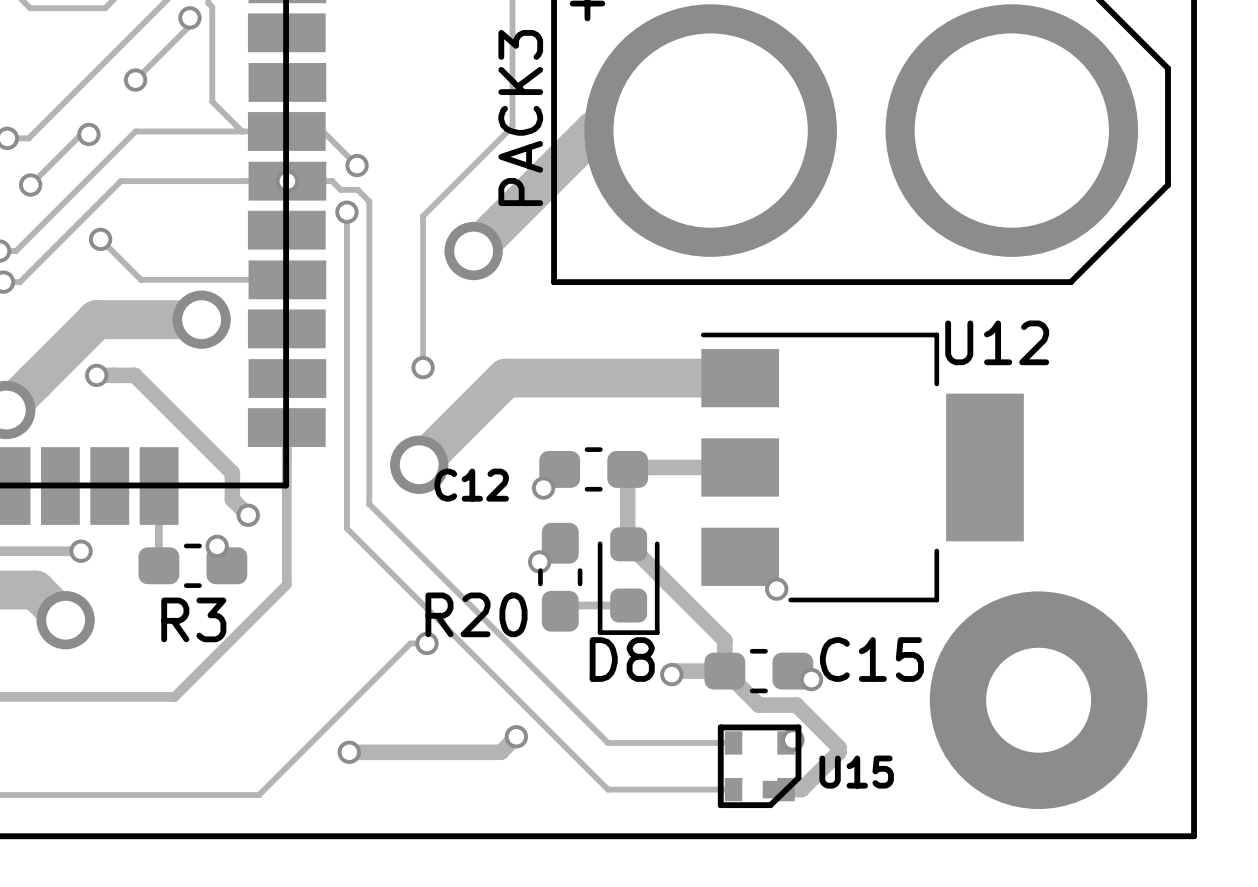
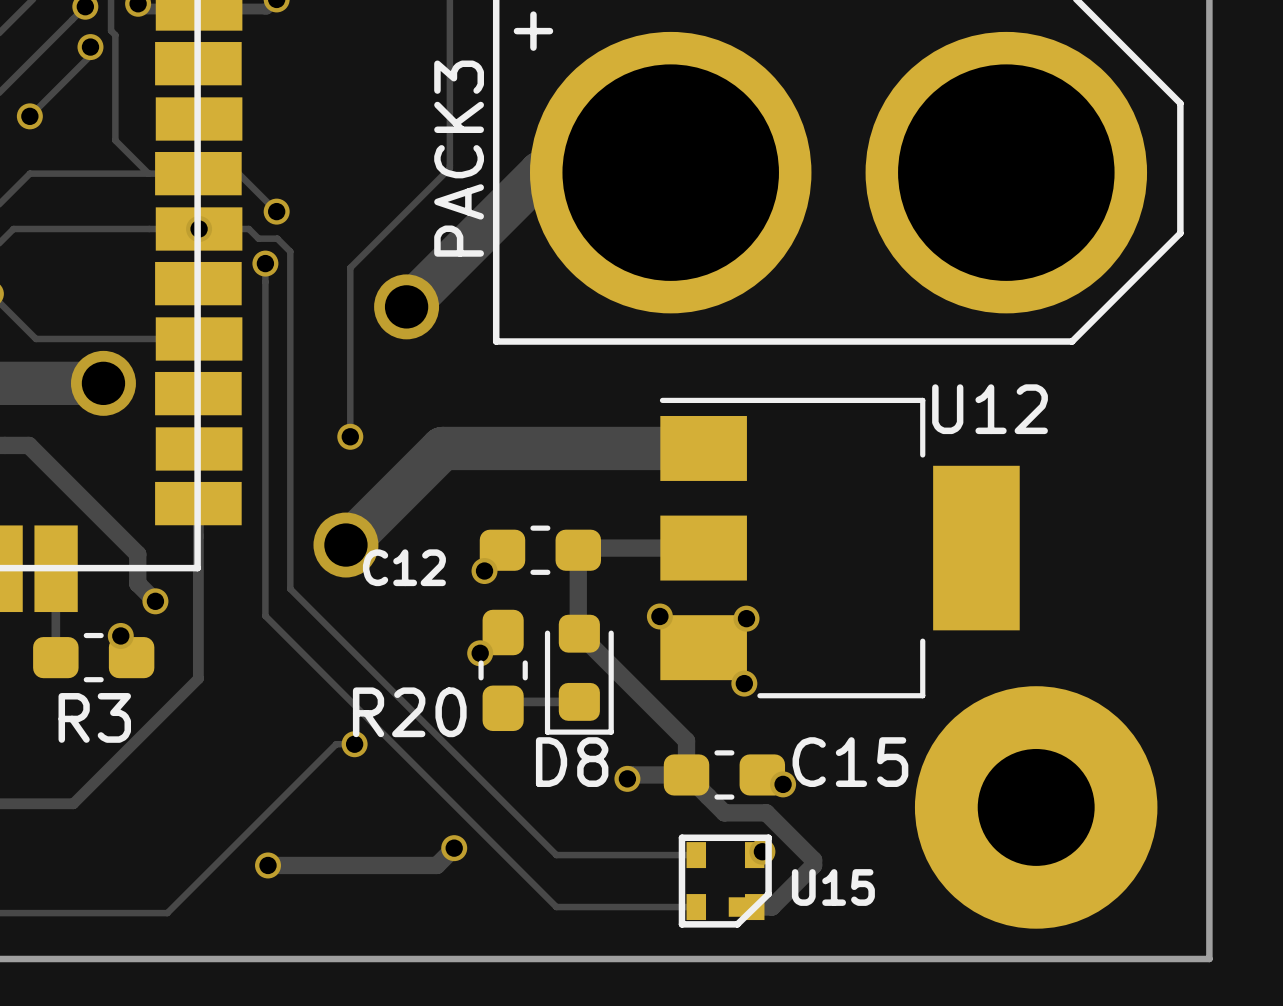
via: none -> (659, 616)
via: none -> (746, 618)

